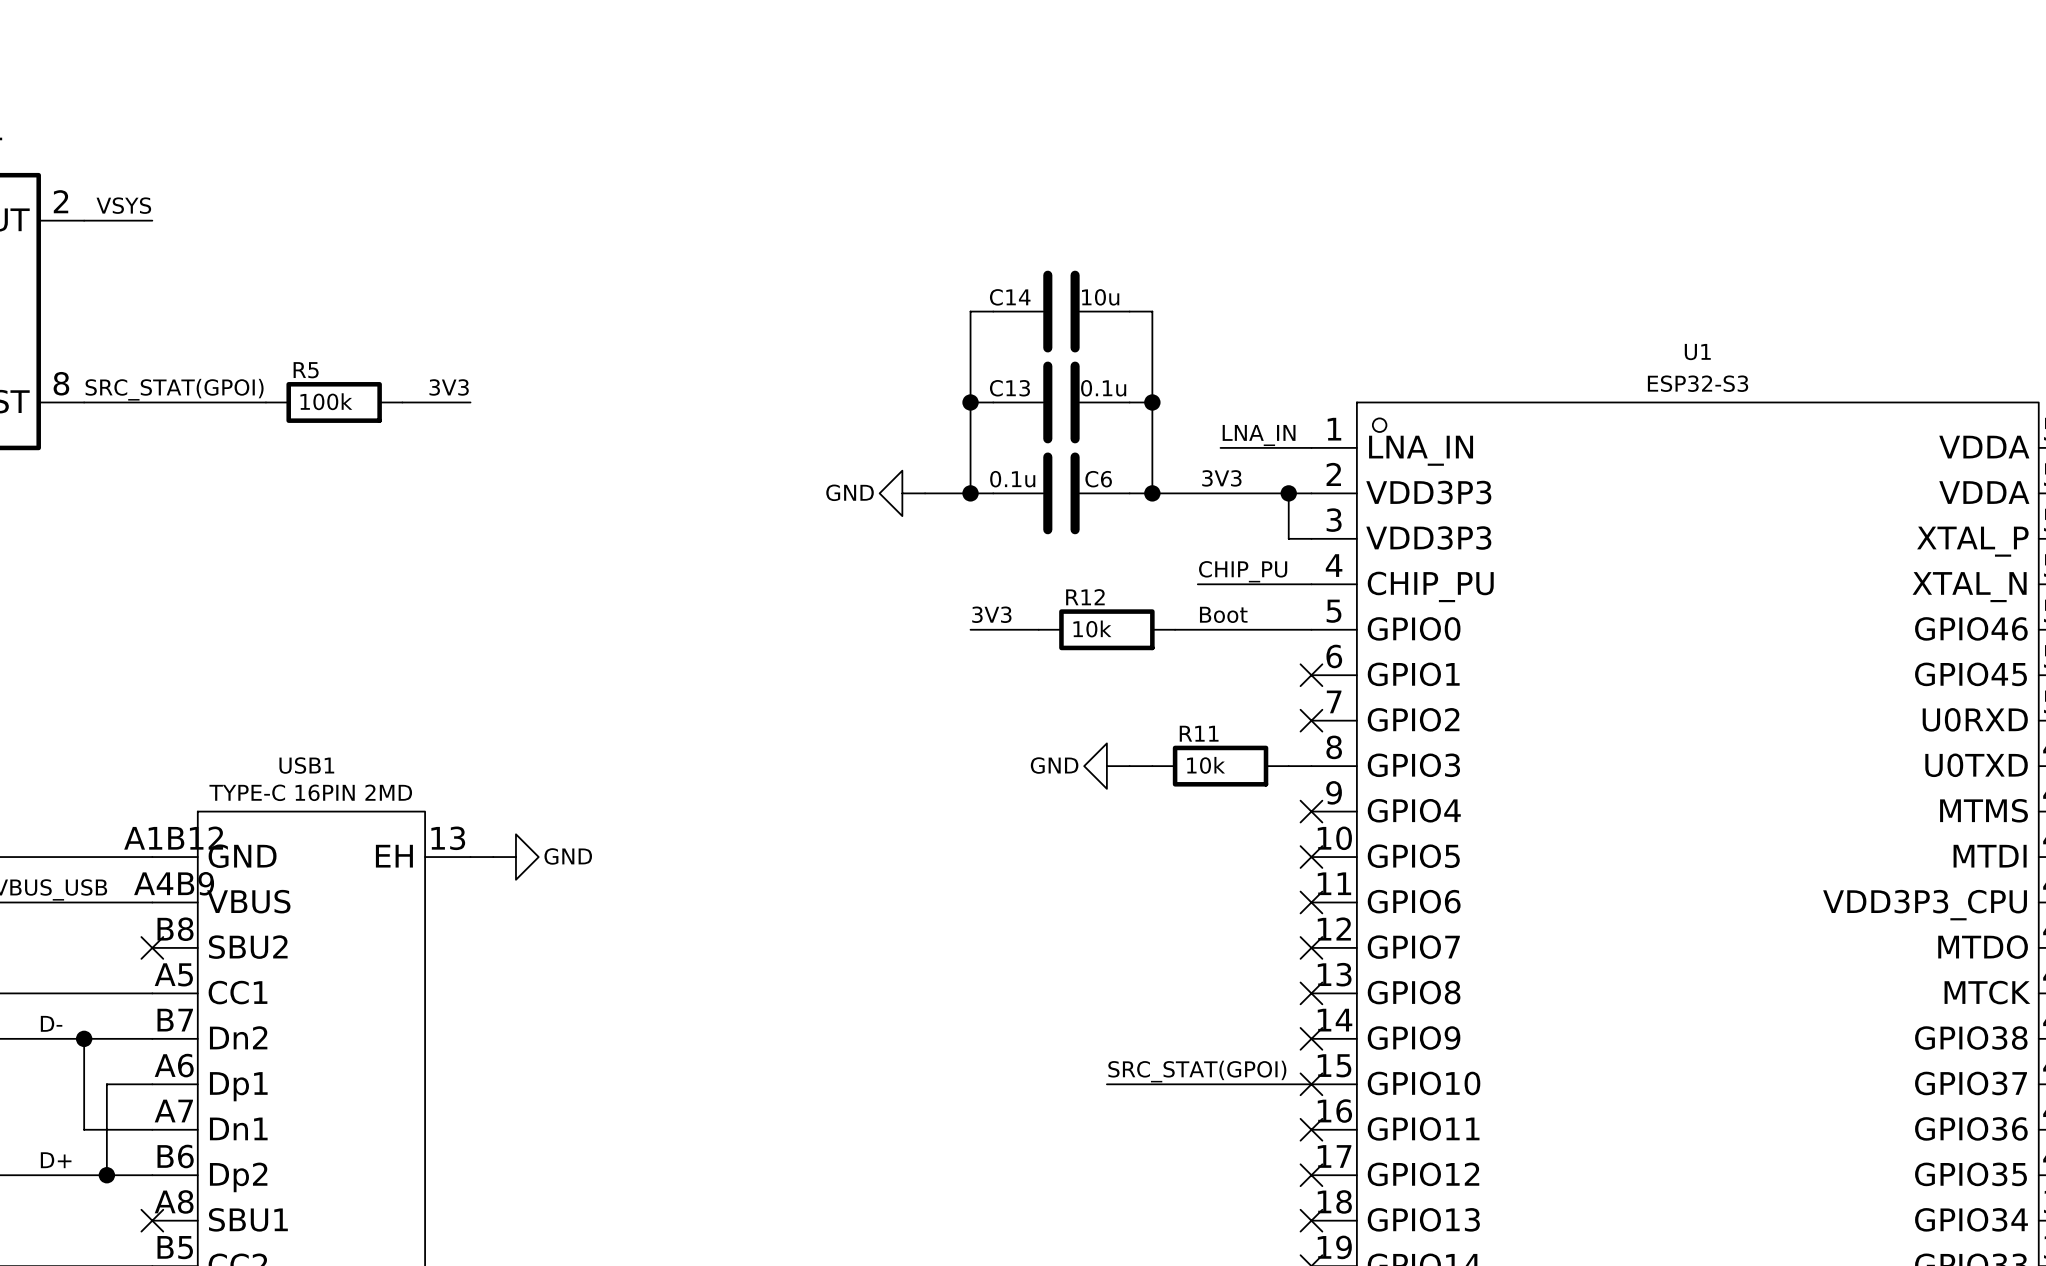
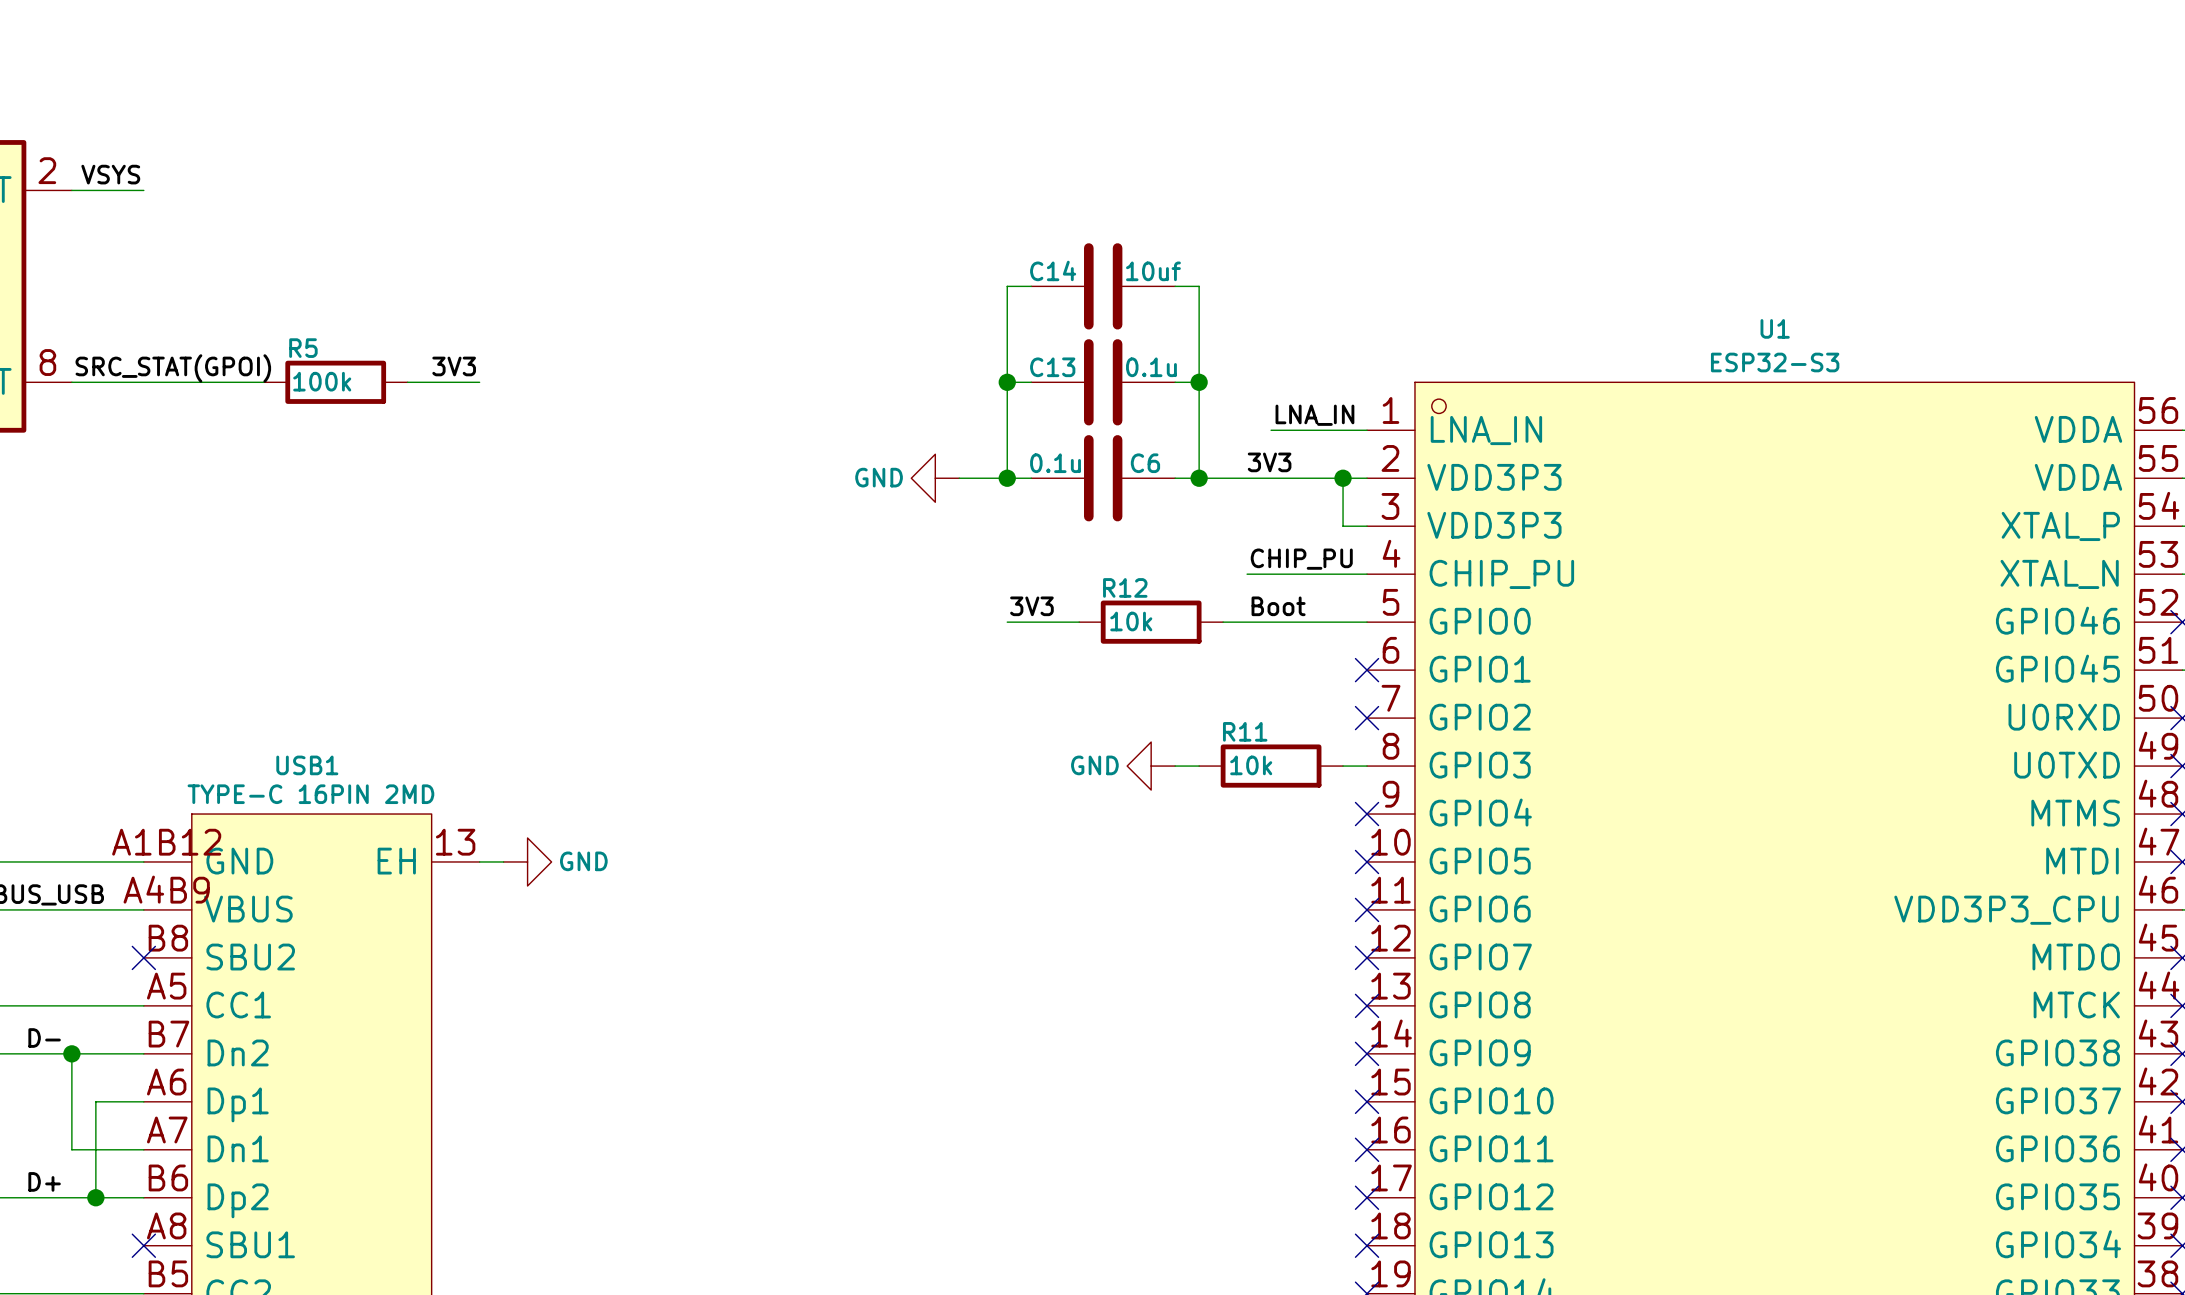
C14 value: 10u (1100, 297) -> 10uf (1153, 271)
label: SRC_STAT(GPOI) (1197, 1071) -> none
wire: (1106, 1084) (1311, 1084) -> none

